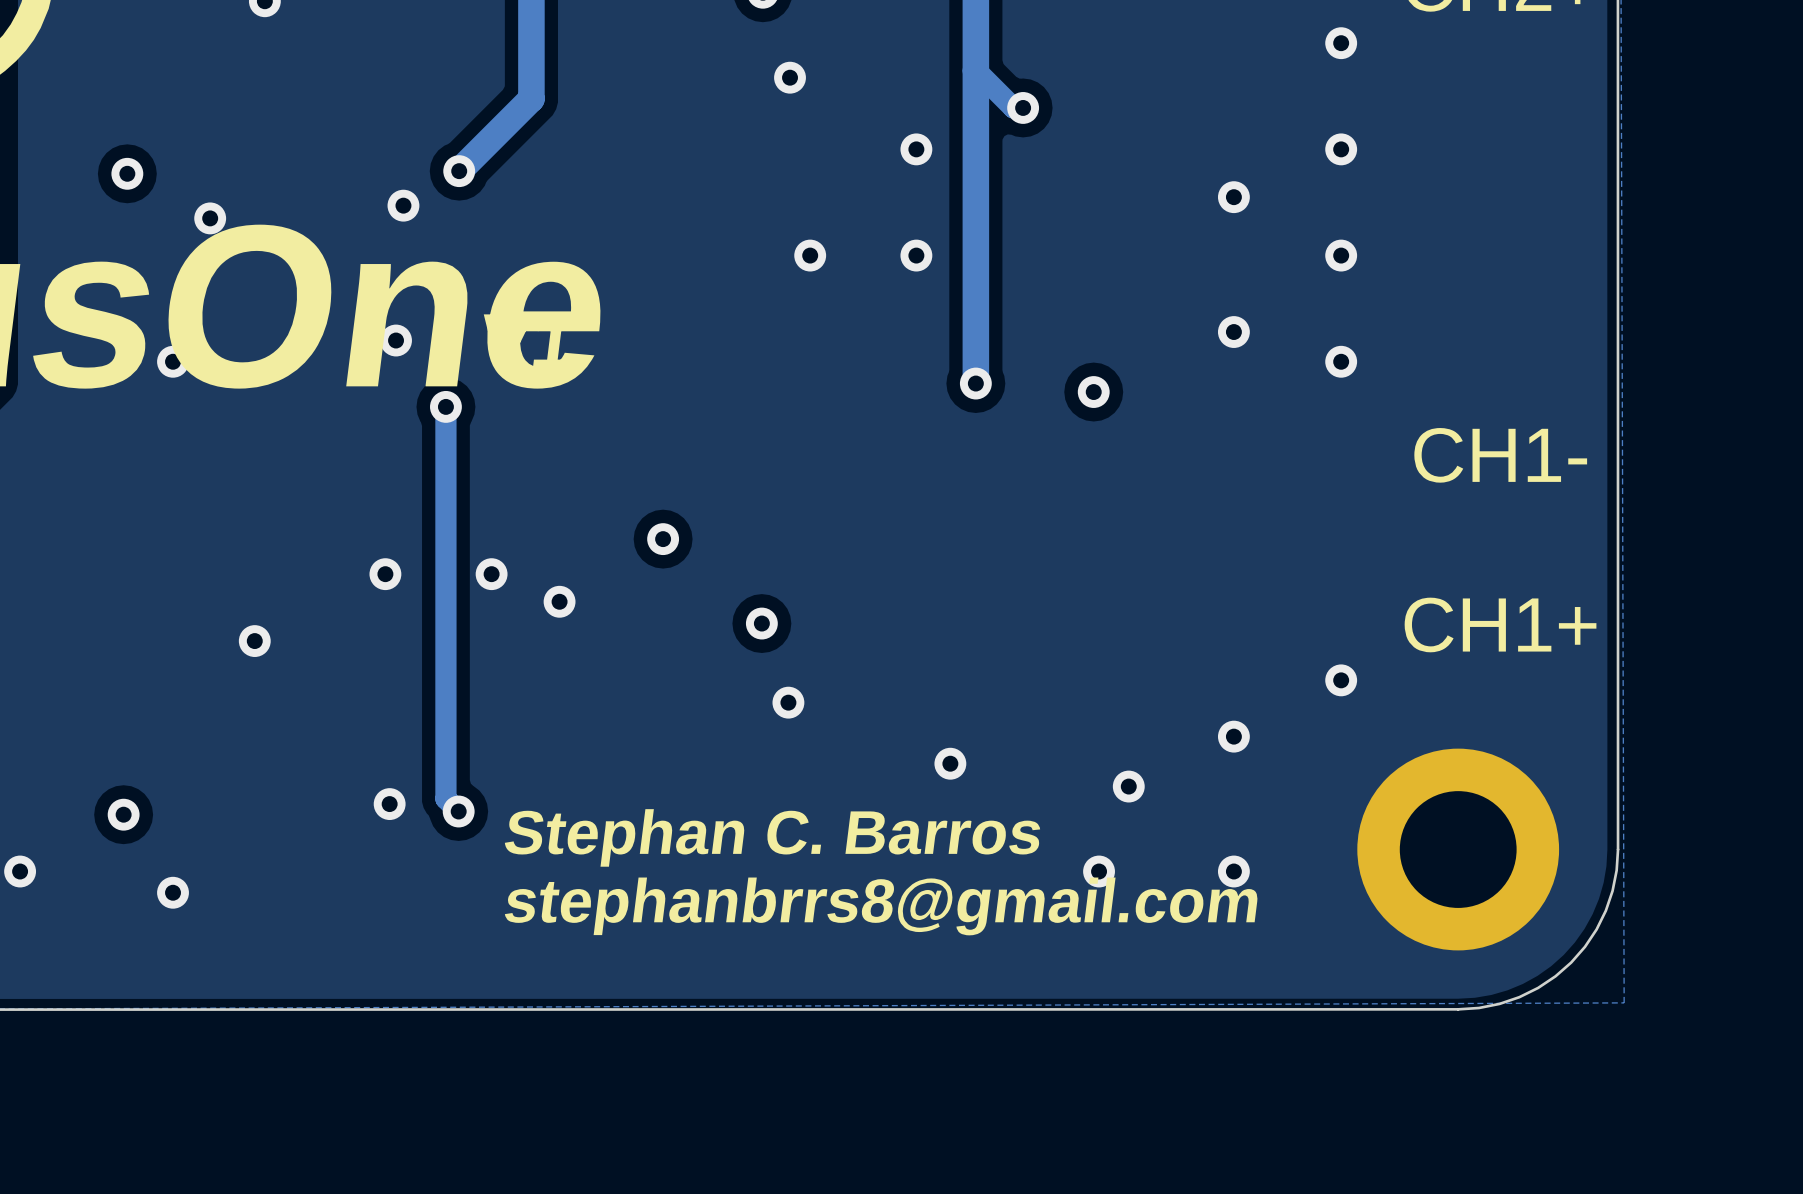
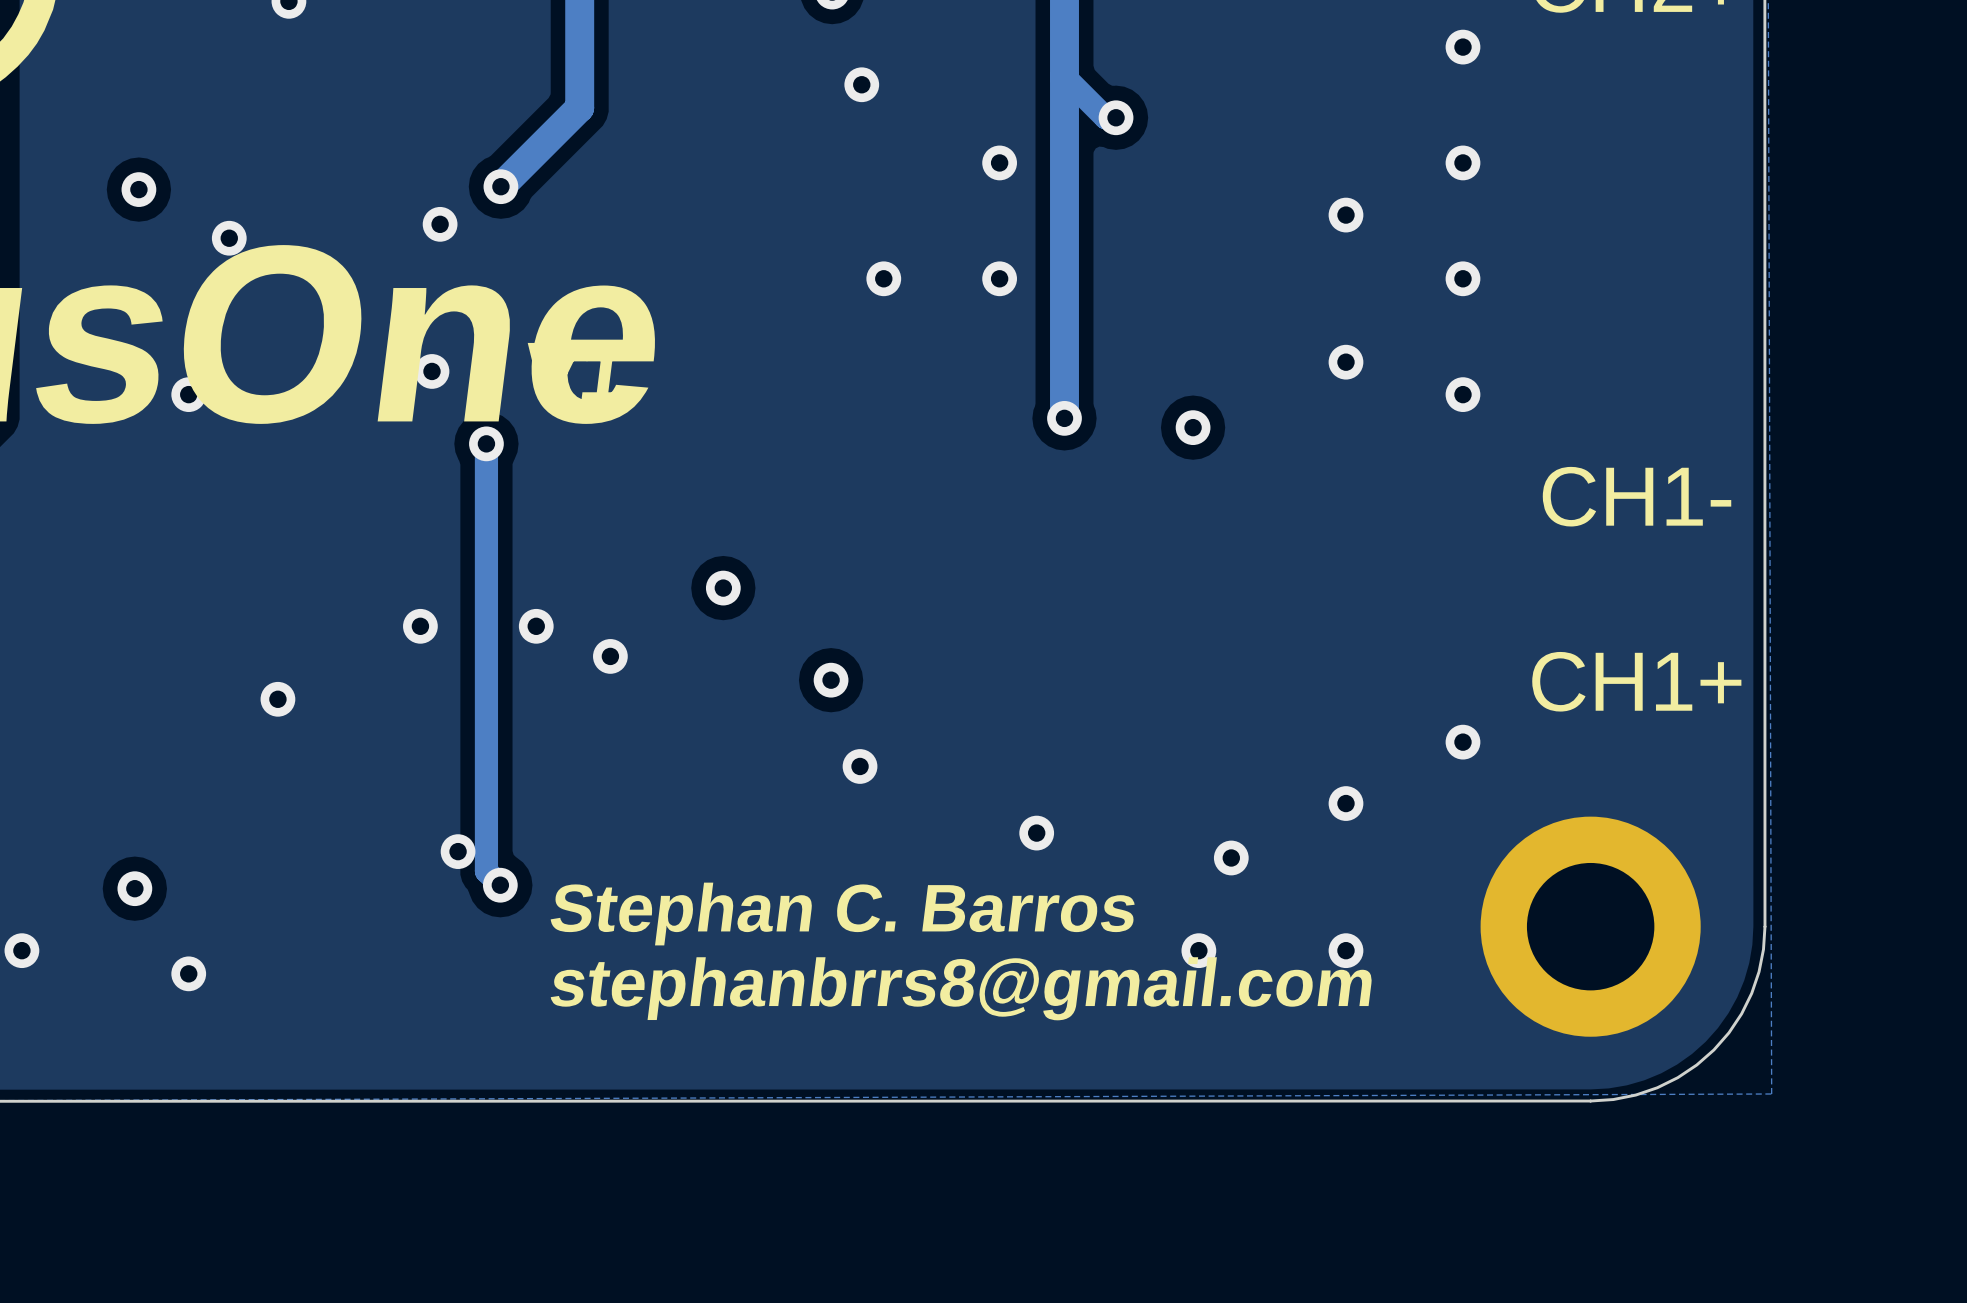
via position: (389, 804) -> (458, 851)

